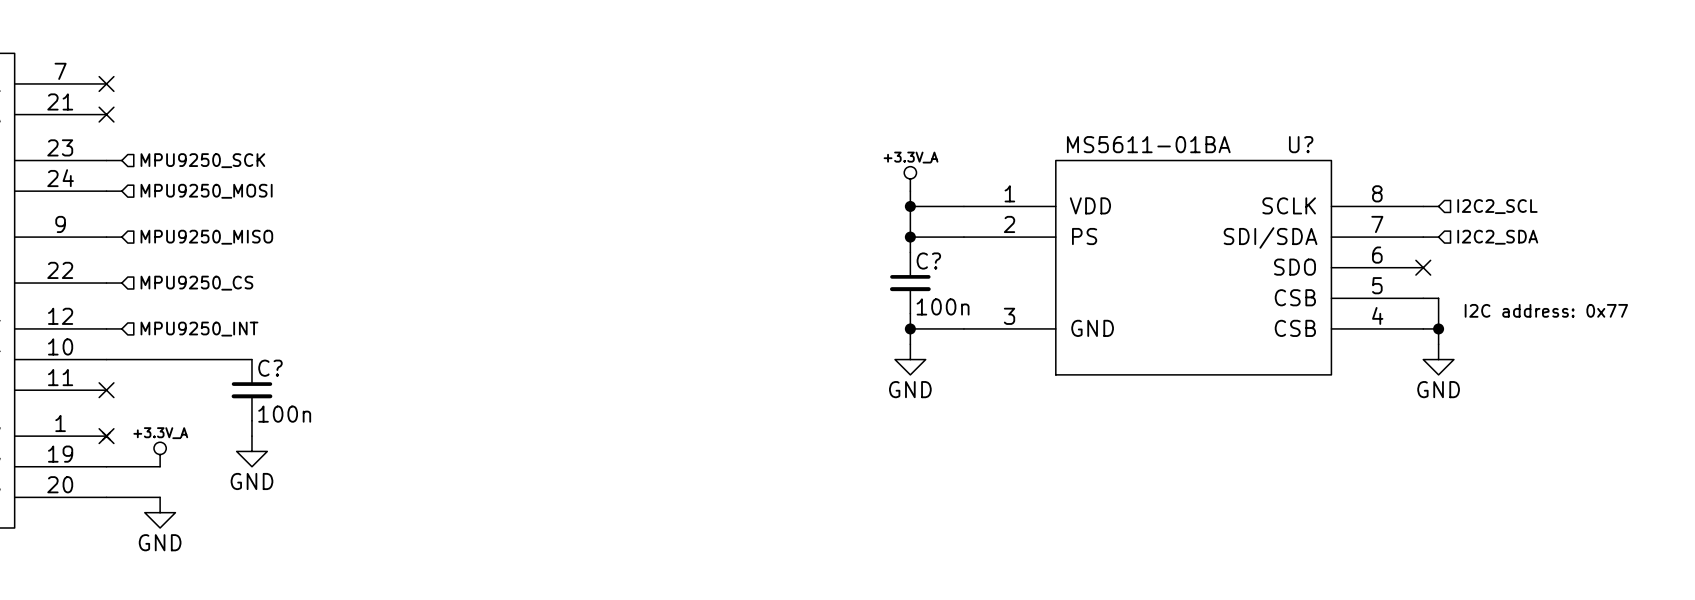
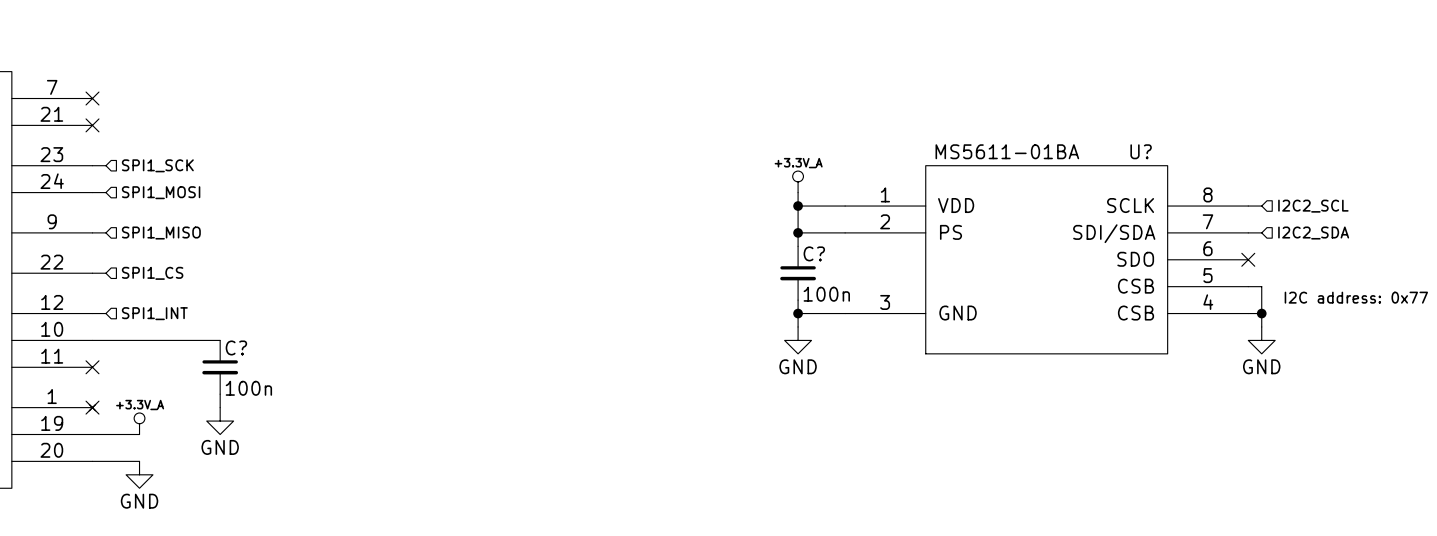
hierarchical label: MPU9250_SCK (202, 160) -> SPI1_SCK (157, 165)
hierarchical label: MPU9250_MOSI (206, 191) -> SPI1_MOSI (161, 192)
hierarchical label: MPU9250_MISO (206, 237) -> SPI1_MISO (161, 233)
hierarchical label: MPU9250_CS (196, 283) -> SPI1_CS (152, 273)
hierarchical label: MPU9250_INT (199, 329) -> SPI1_INT (154, 313)

